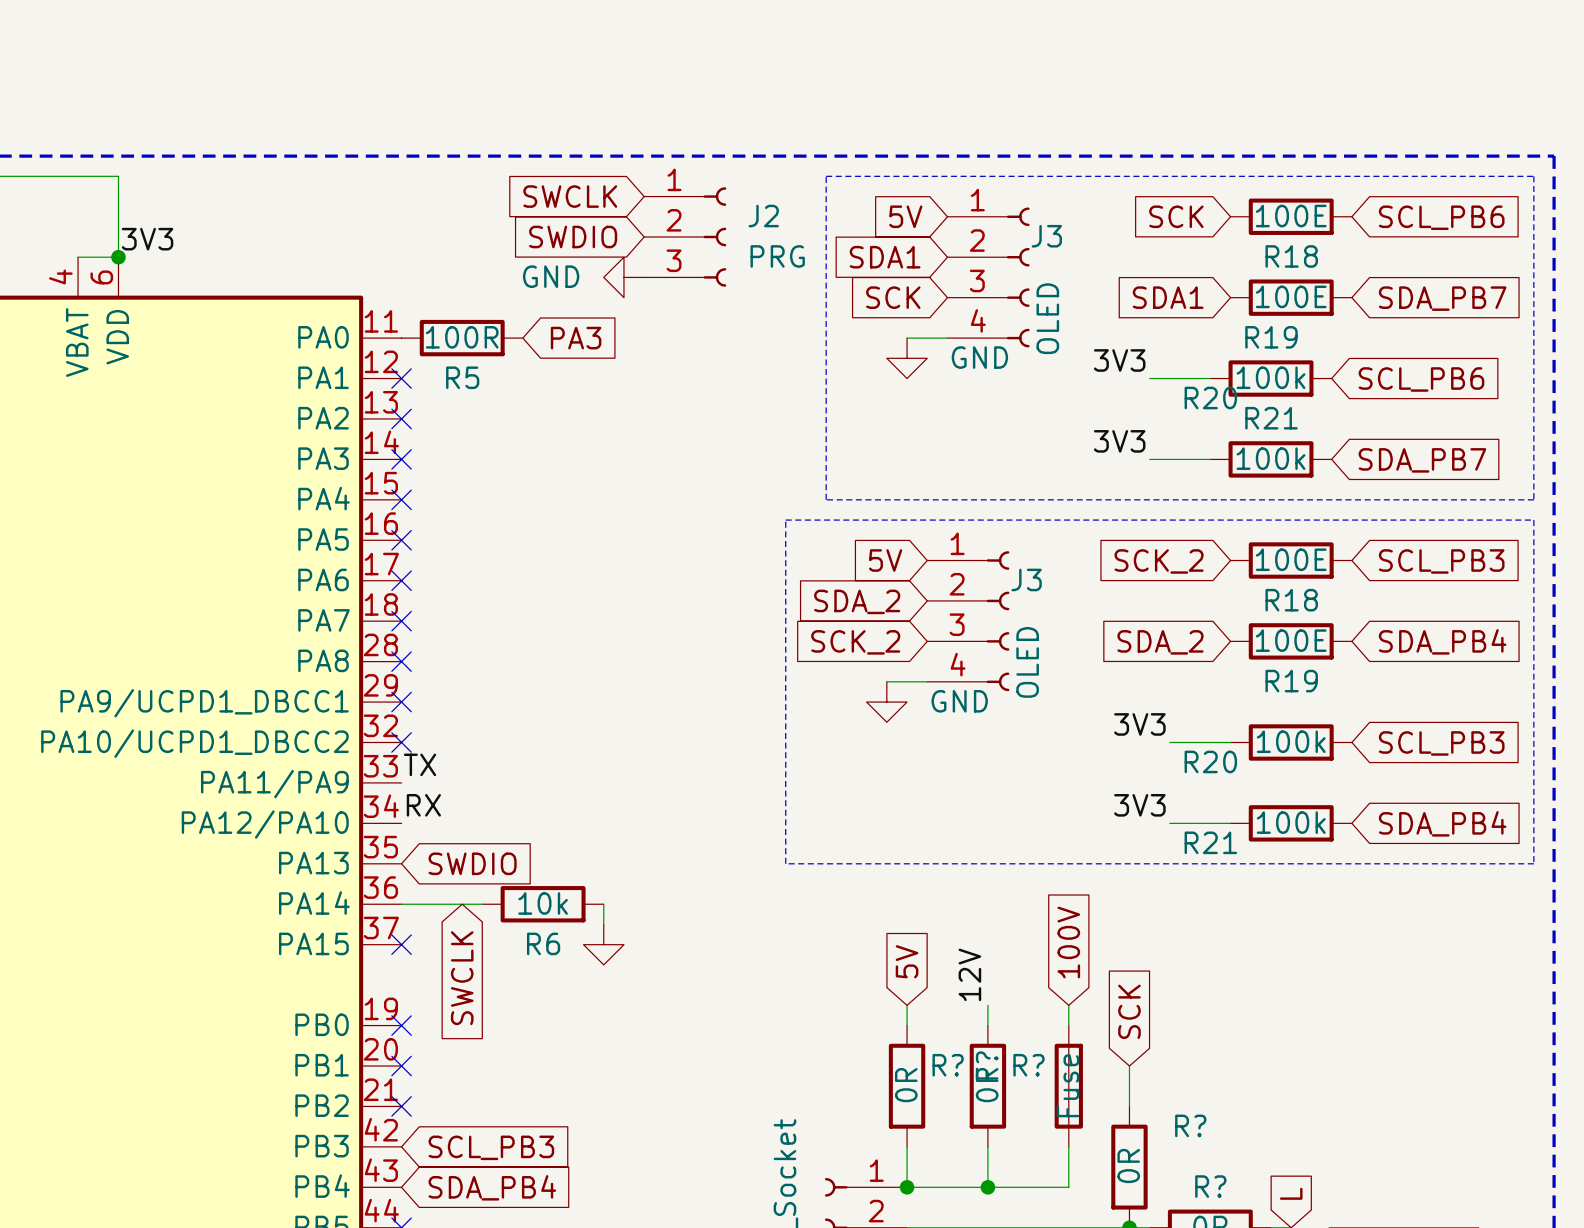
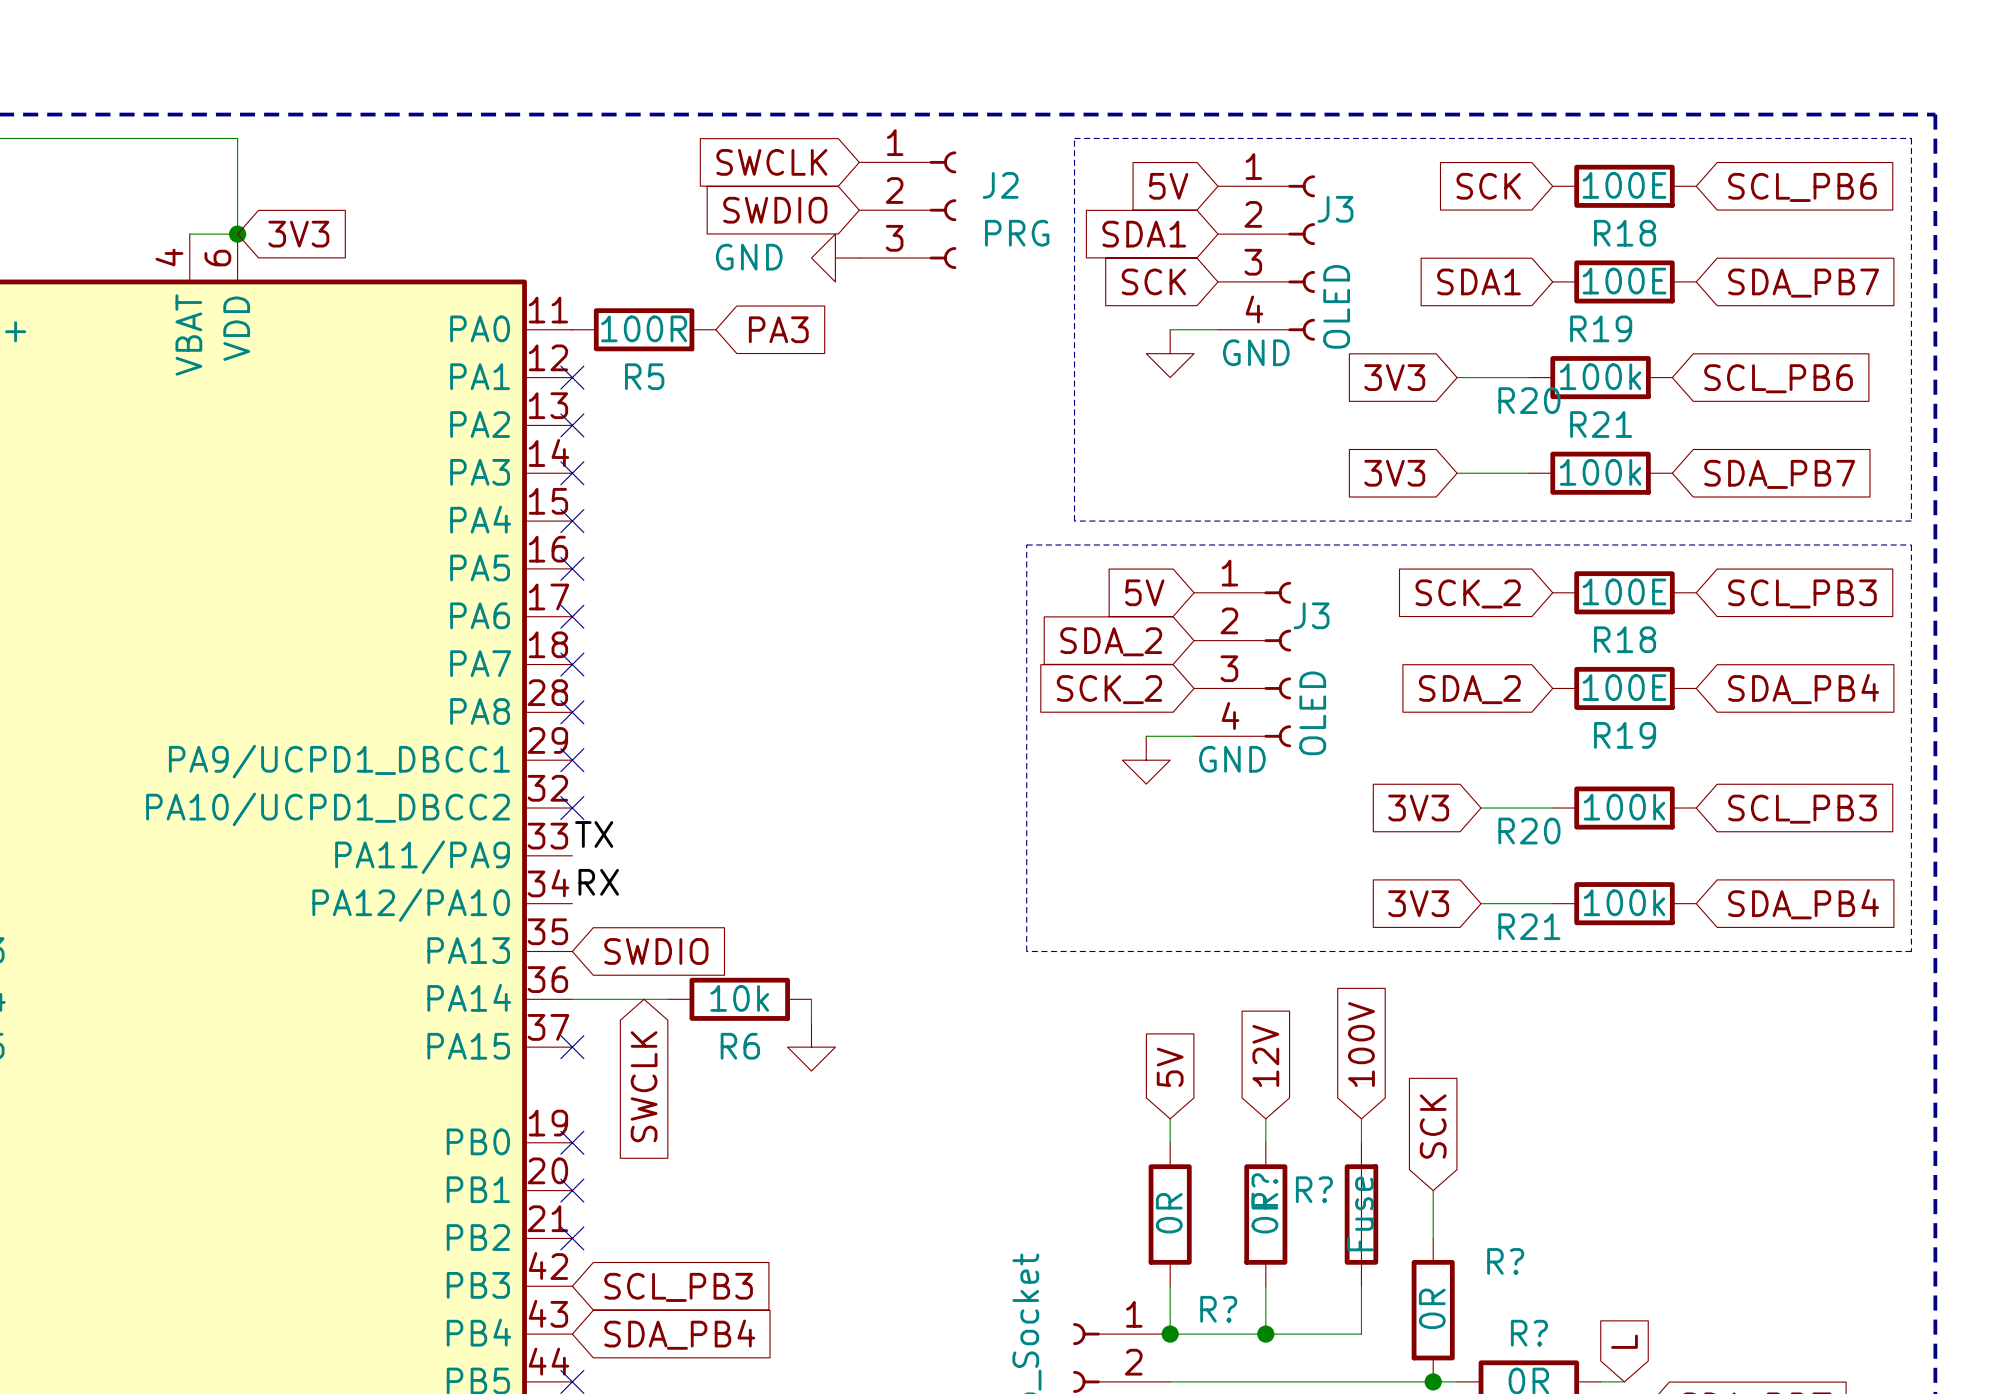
label: 3V3 (147, 239) -> none
global label: none -> 3V3 (298, 234)
label: 3V3 (1119, 360) -> none
global label: none -> 3V3 (1394, 377)
label: 3V3 (1119, 441) -> none
global label: none -> 3V3 (1394, 473)
label: 3V3 (1139, 724) -> none
global label: none -> 3V3 (1418, 808)
label: 3V3 (1139, 805) -> none
global label: none -> 3V3 (1418, 903)
global label: none -> 12V (1265, 1055)
label: 12V (969, 974) -> none
R? name position: R? (948, 1065) -> R? (1218, 1309)

